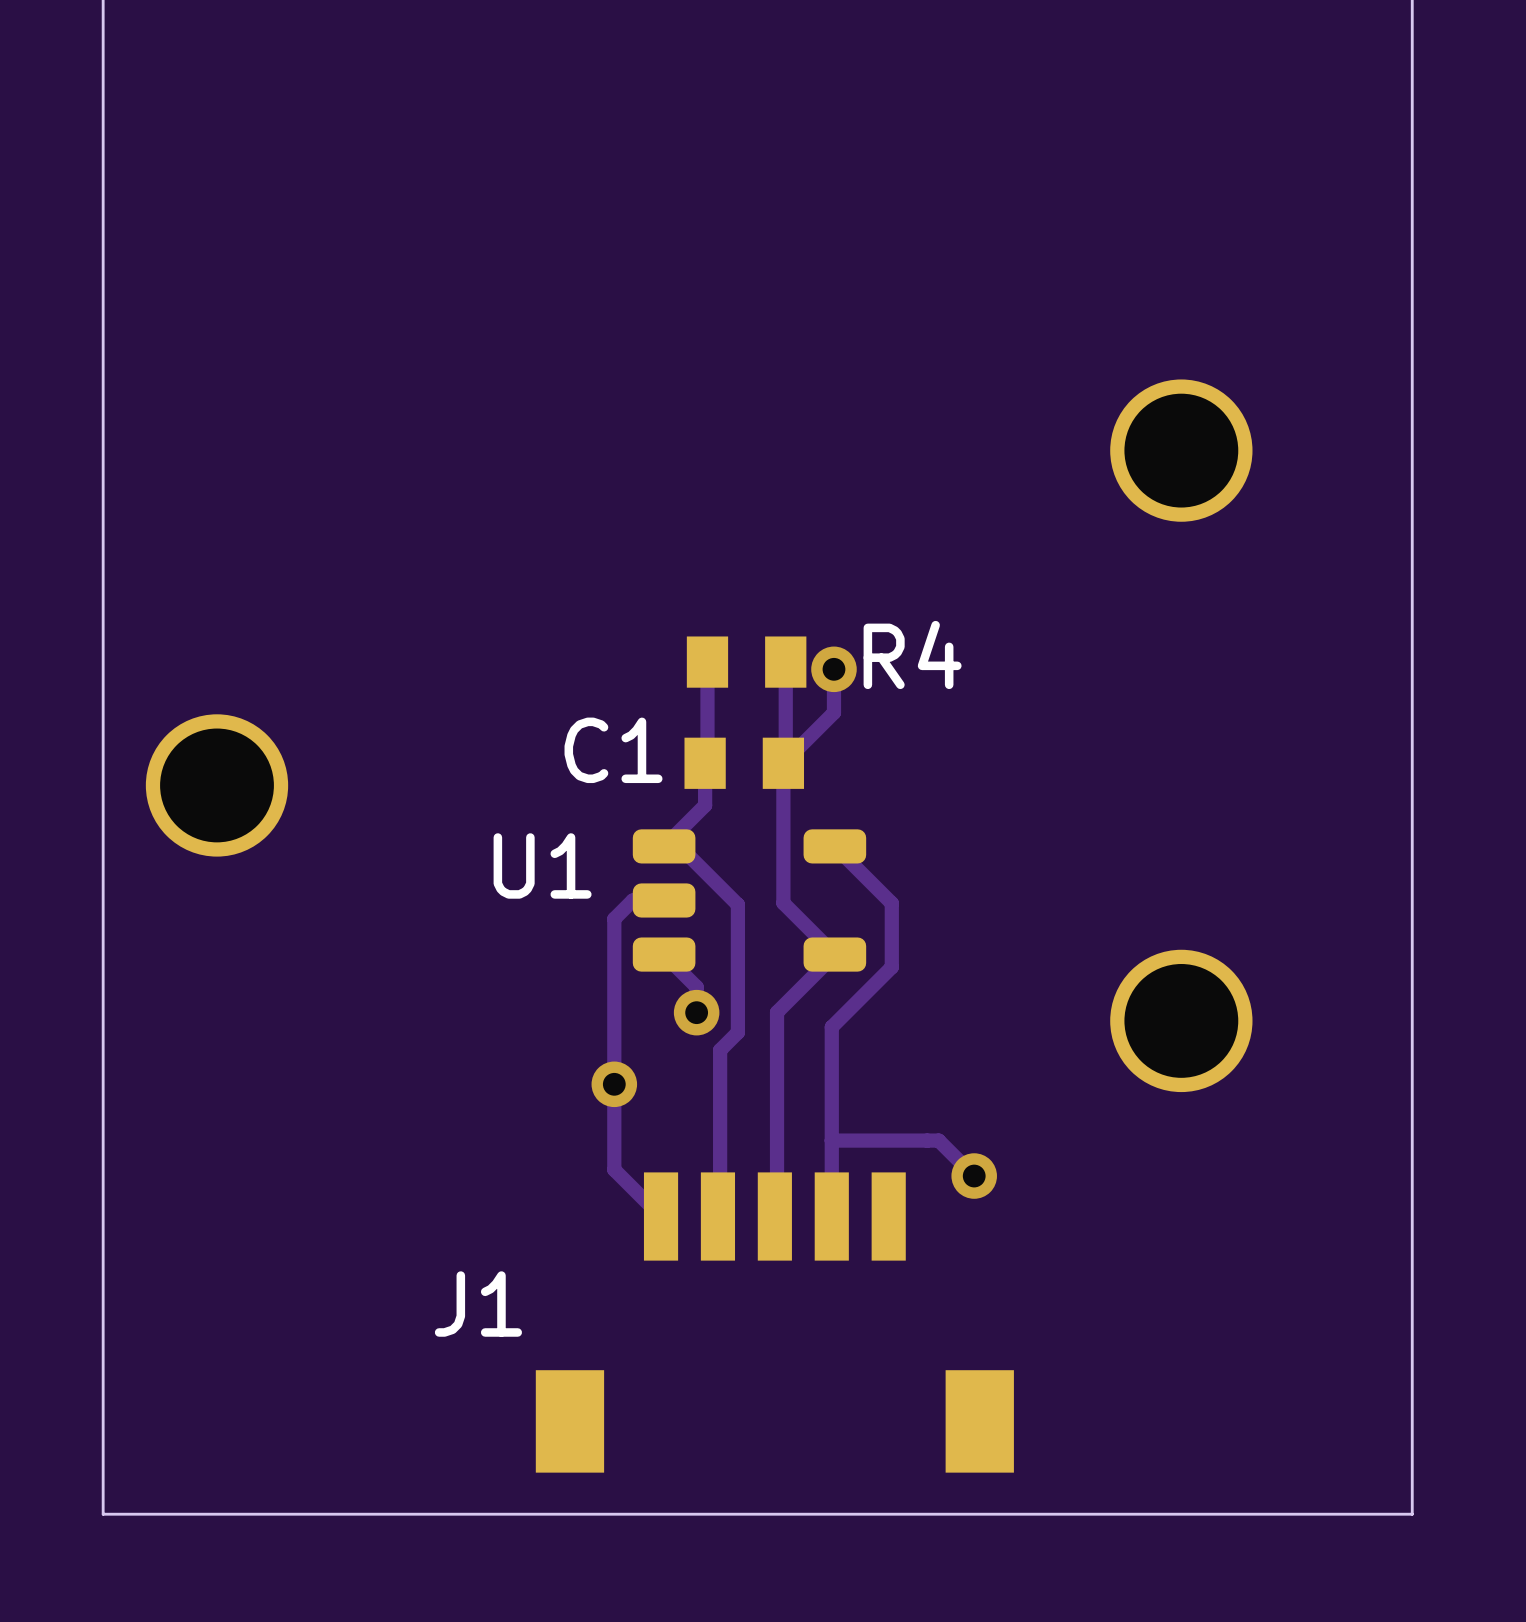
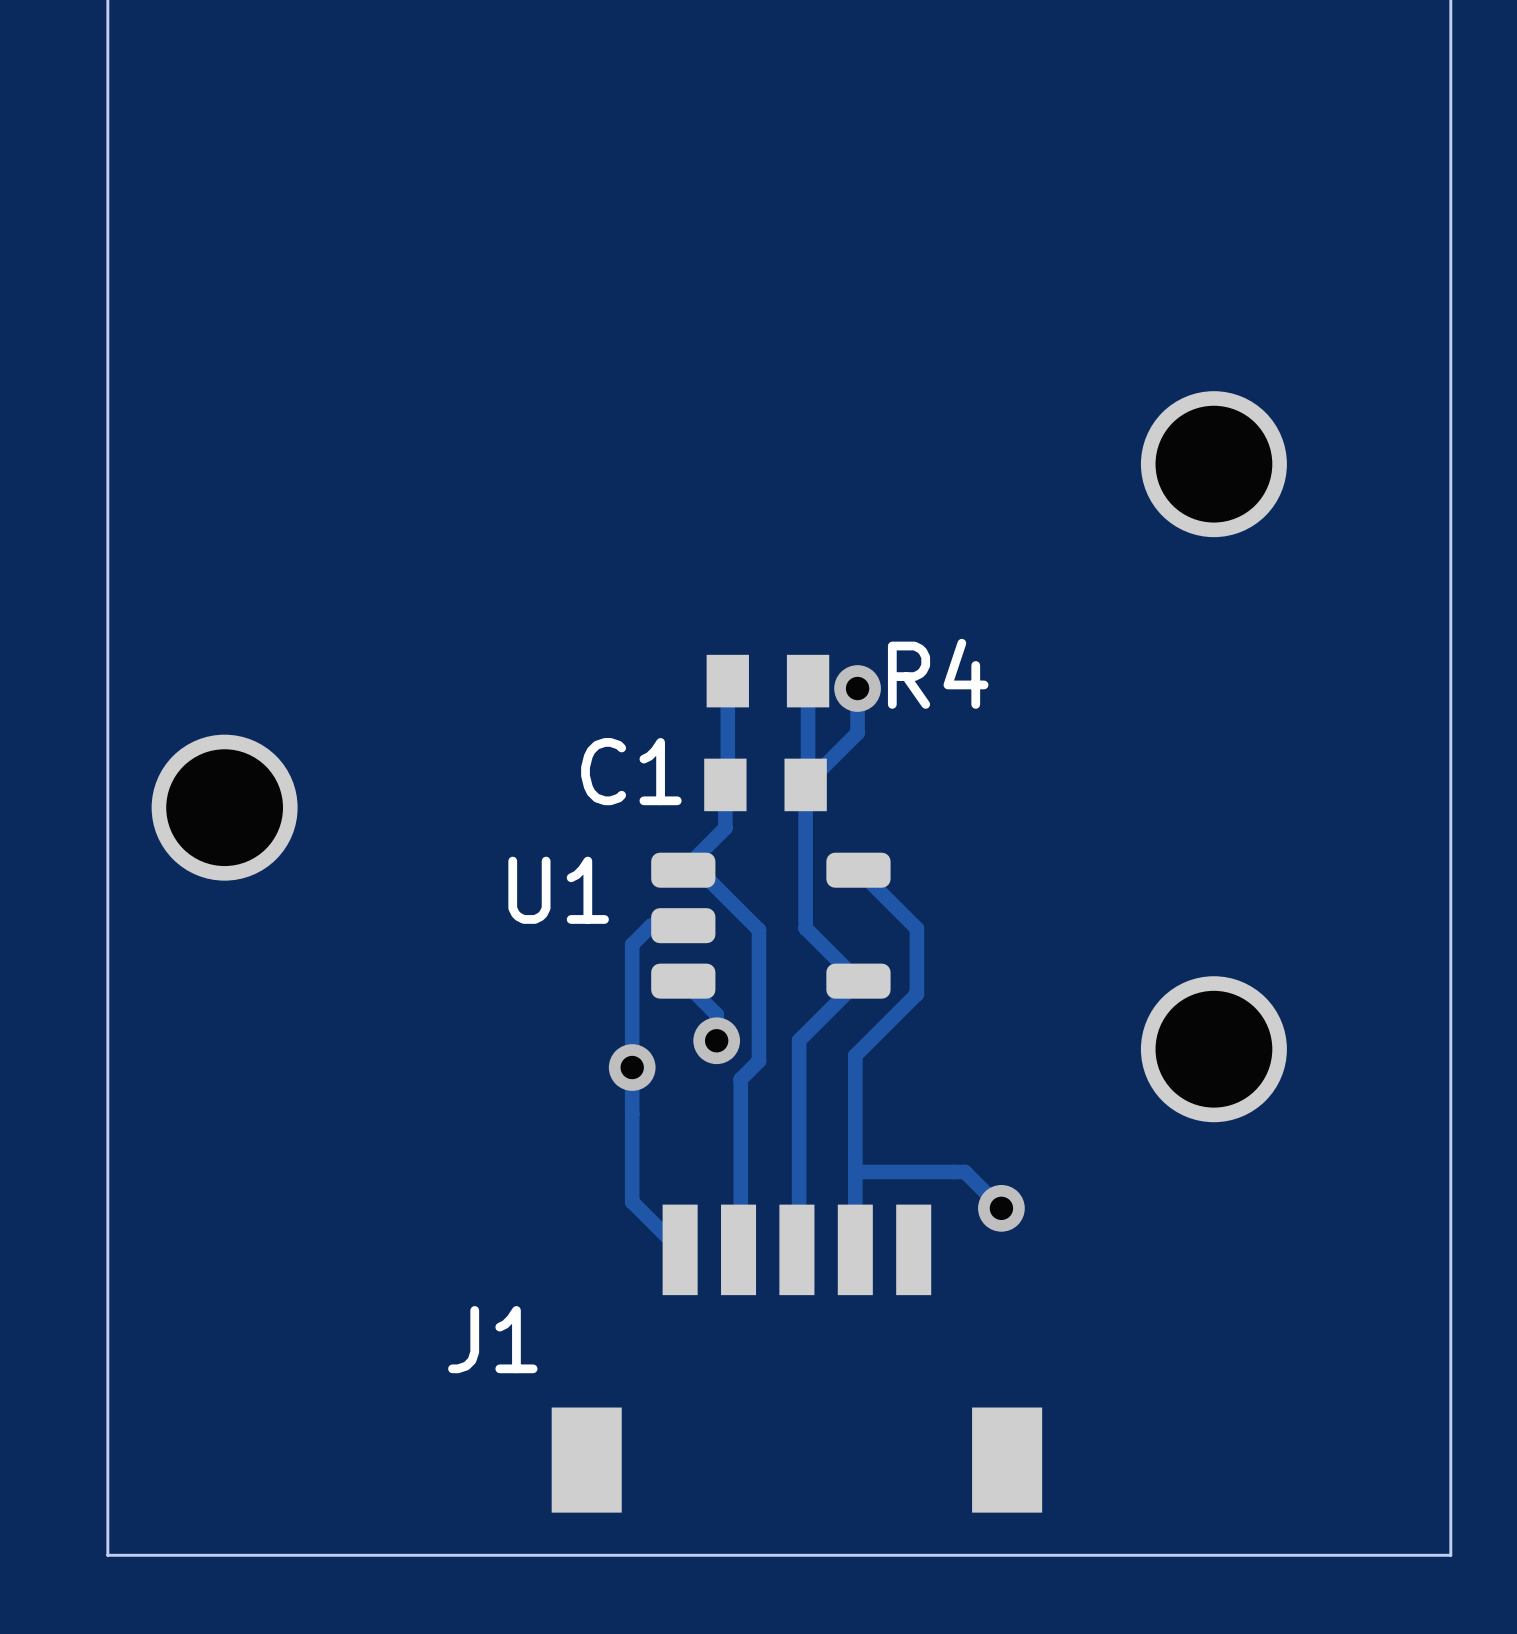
via position: (614, 1084) -> (632, 1067)

